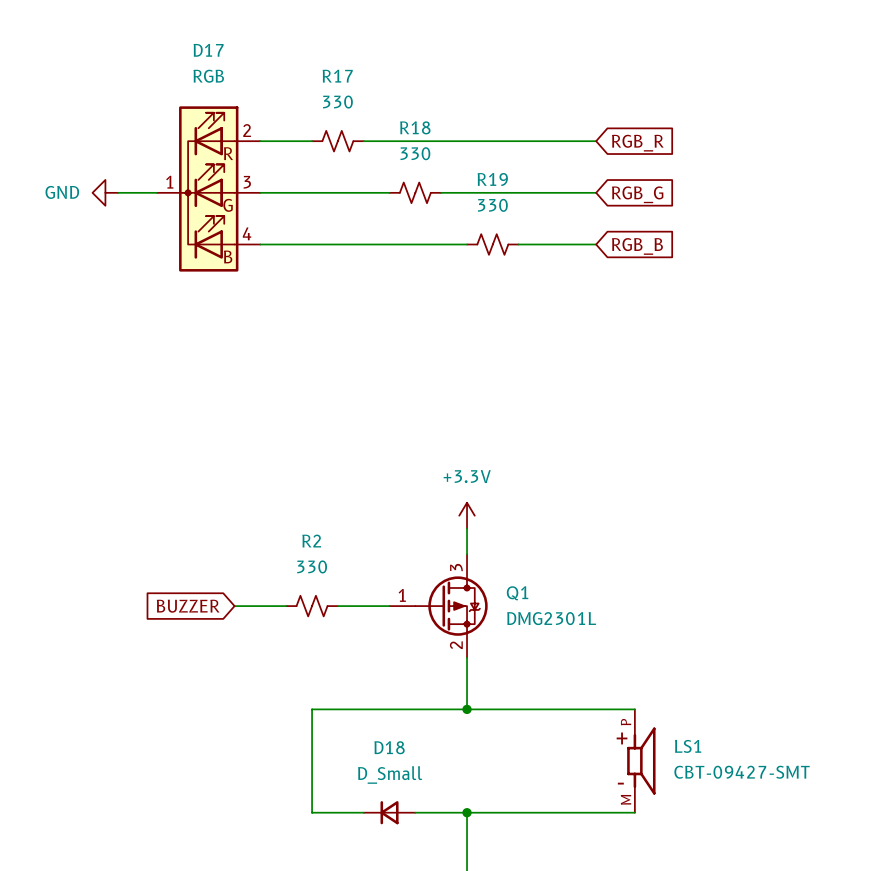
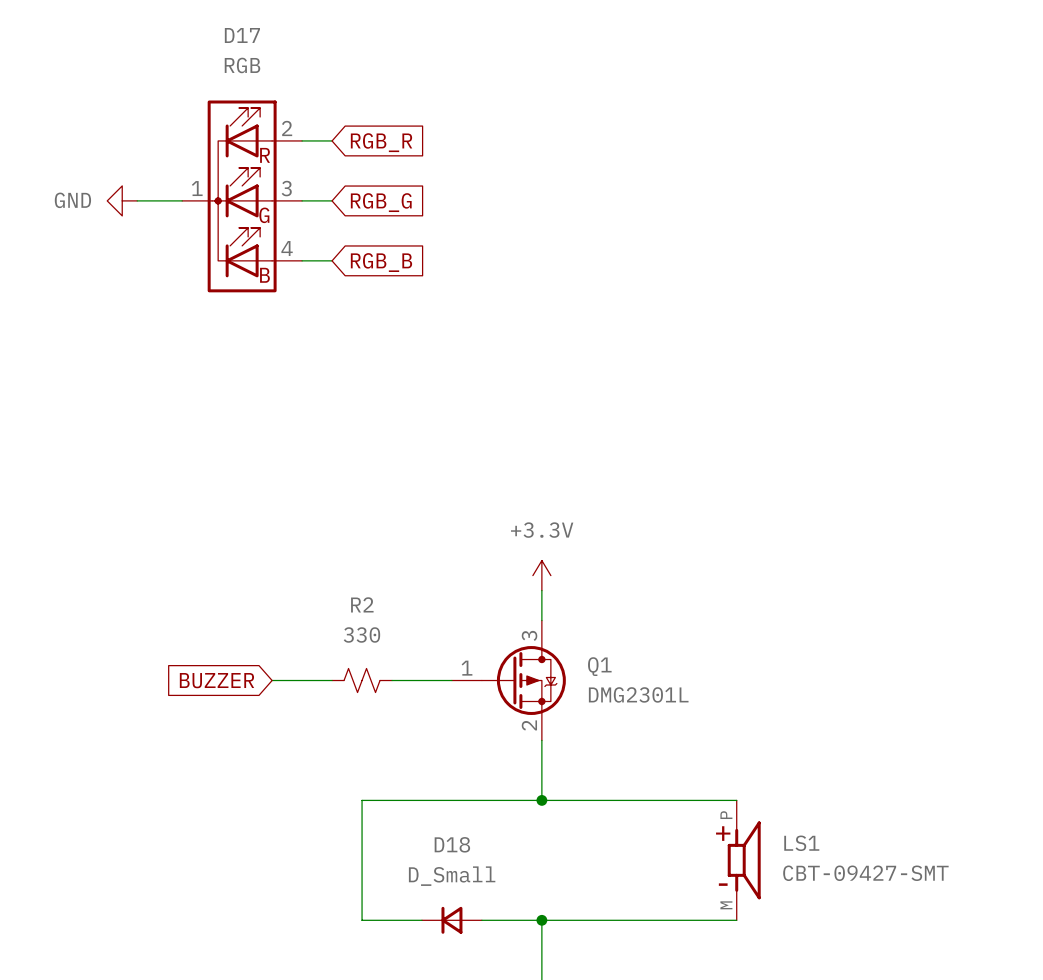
wire: (286, 141) (312, 141) -> none
R17: 330 (337, 141) -> none
wire: (363, 141) (596, 141) -> none
global label: none -> RGB_R (381, 142)
global label: RGB_R (637, 143) -> none
wire: (286, 192) (389, 192) -> none
R18: 330 (415, 192) -> none
wire: (441, 192) (596, 192) -> none
global label: none -> RGB_G (381, 202)
global label: RGB_G (637, 194) -> none
wire: (286, 244) (467, 244) -> none
R19: 330 (492, 244) -> none
wire: (518, 244) (596, 244) -> none
global label: none -> RGB_B (381, 262)
global label: RGB_B (637, 246) -> none

